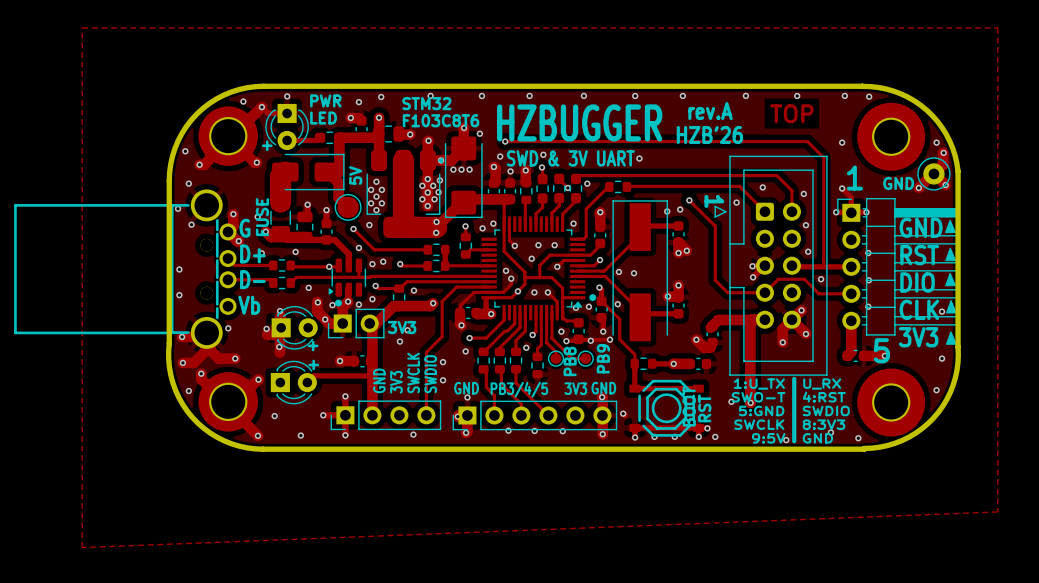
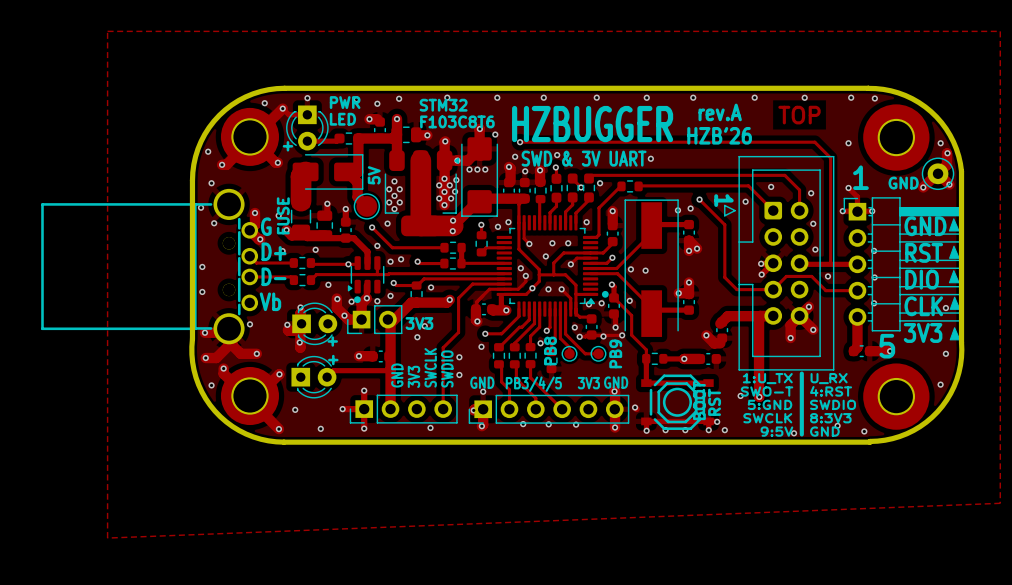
text position: PB8 (570, 361) -> PB8 (550, 351)

